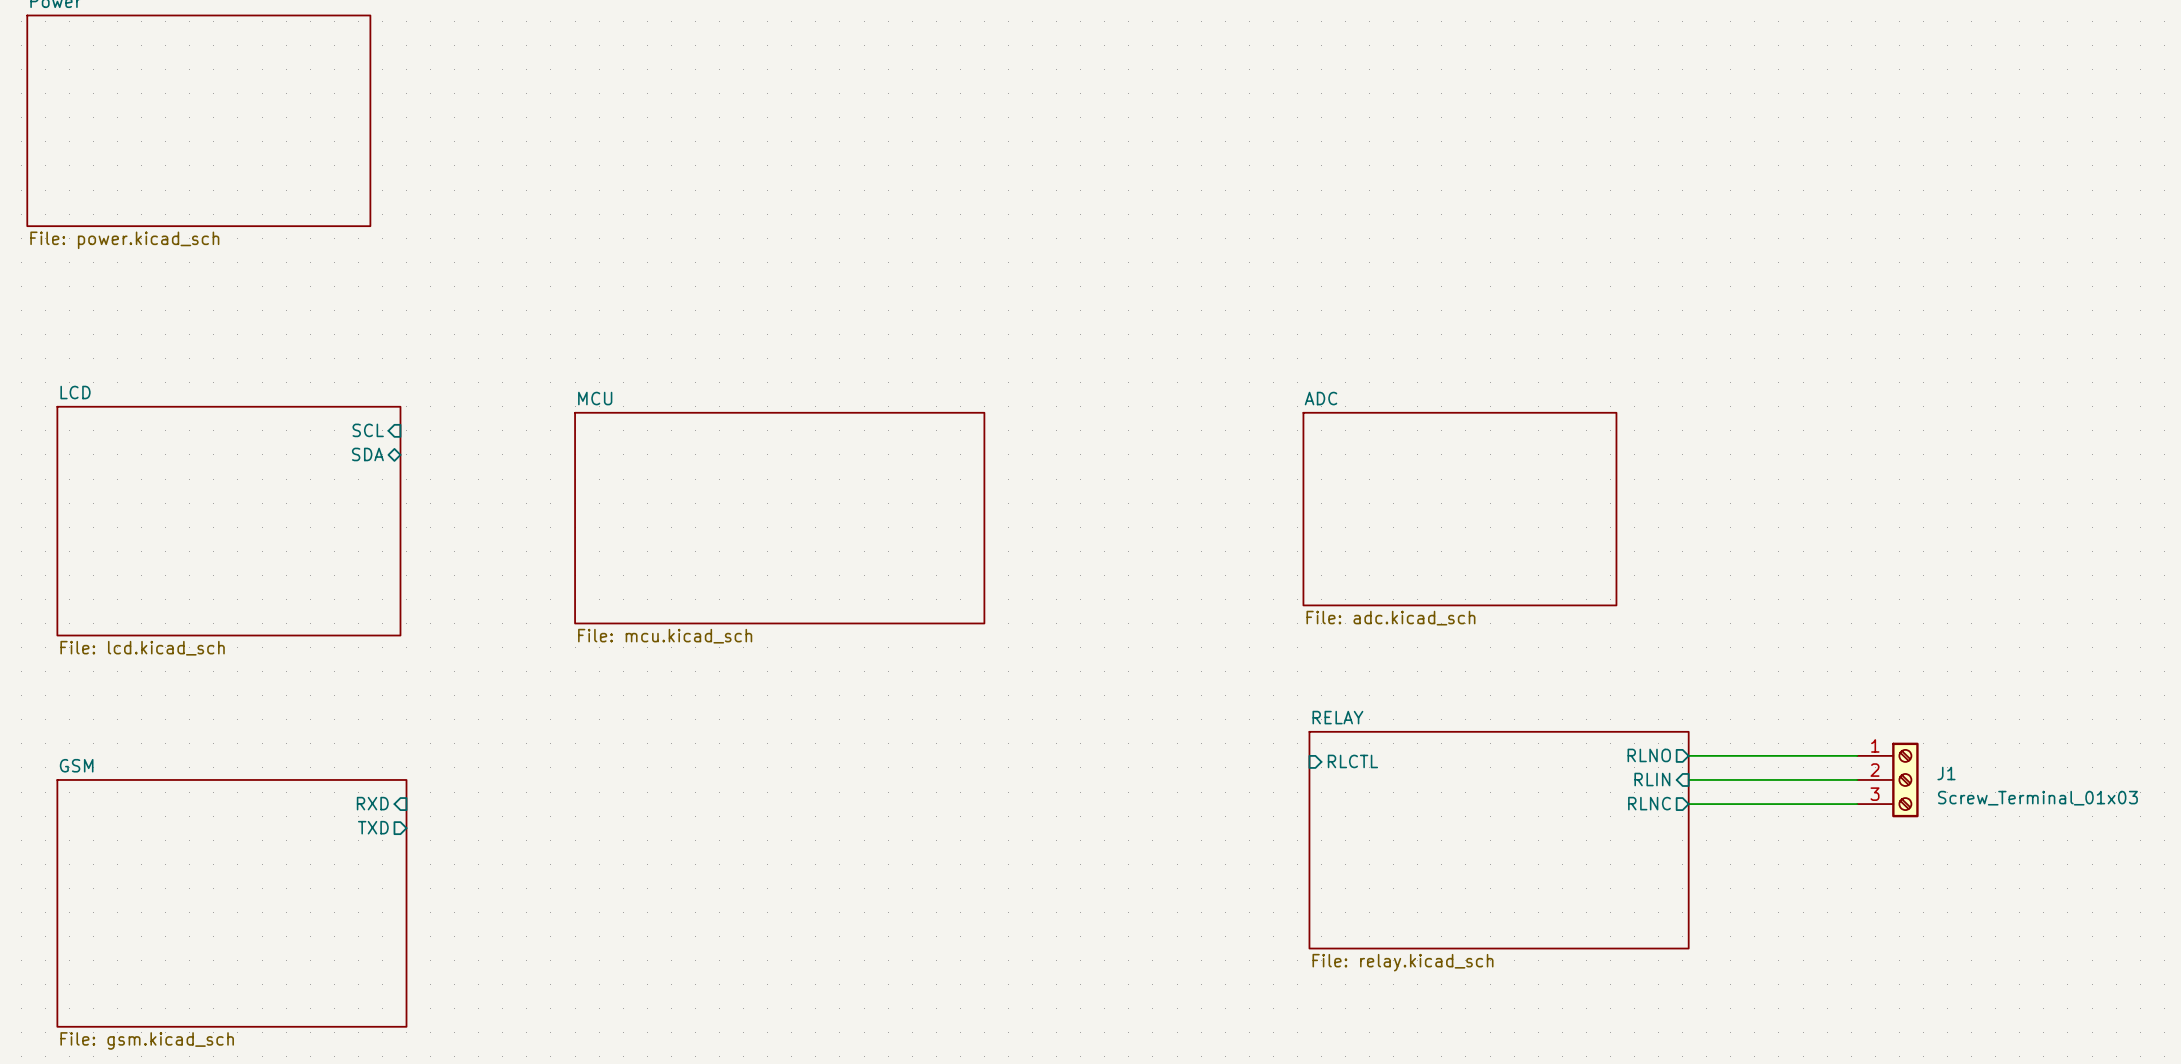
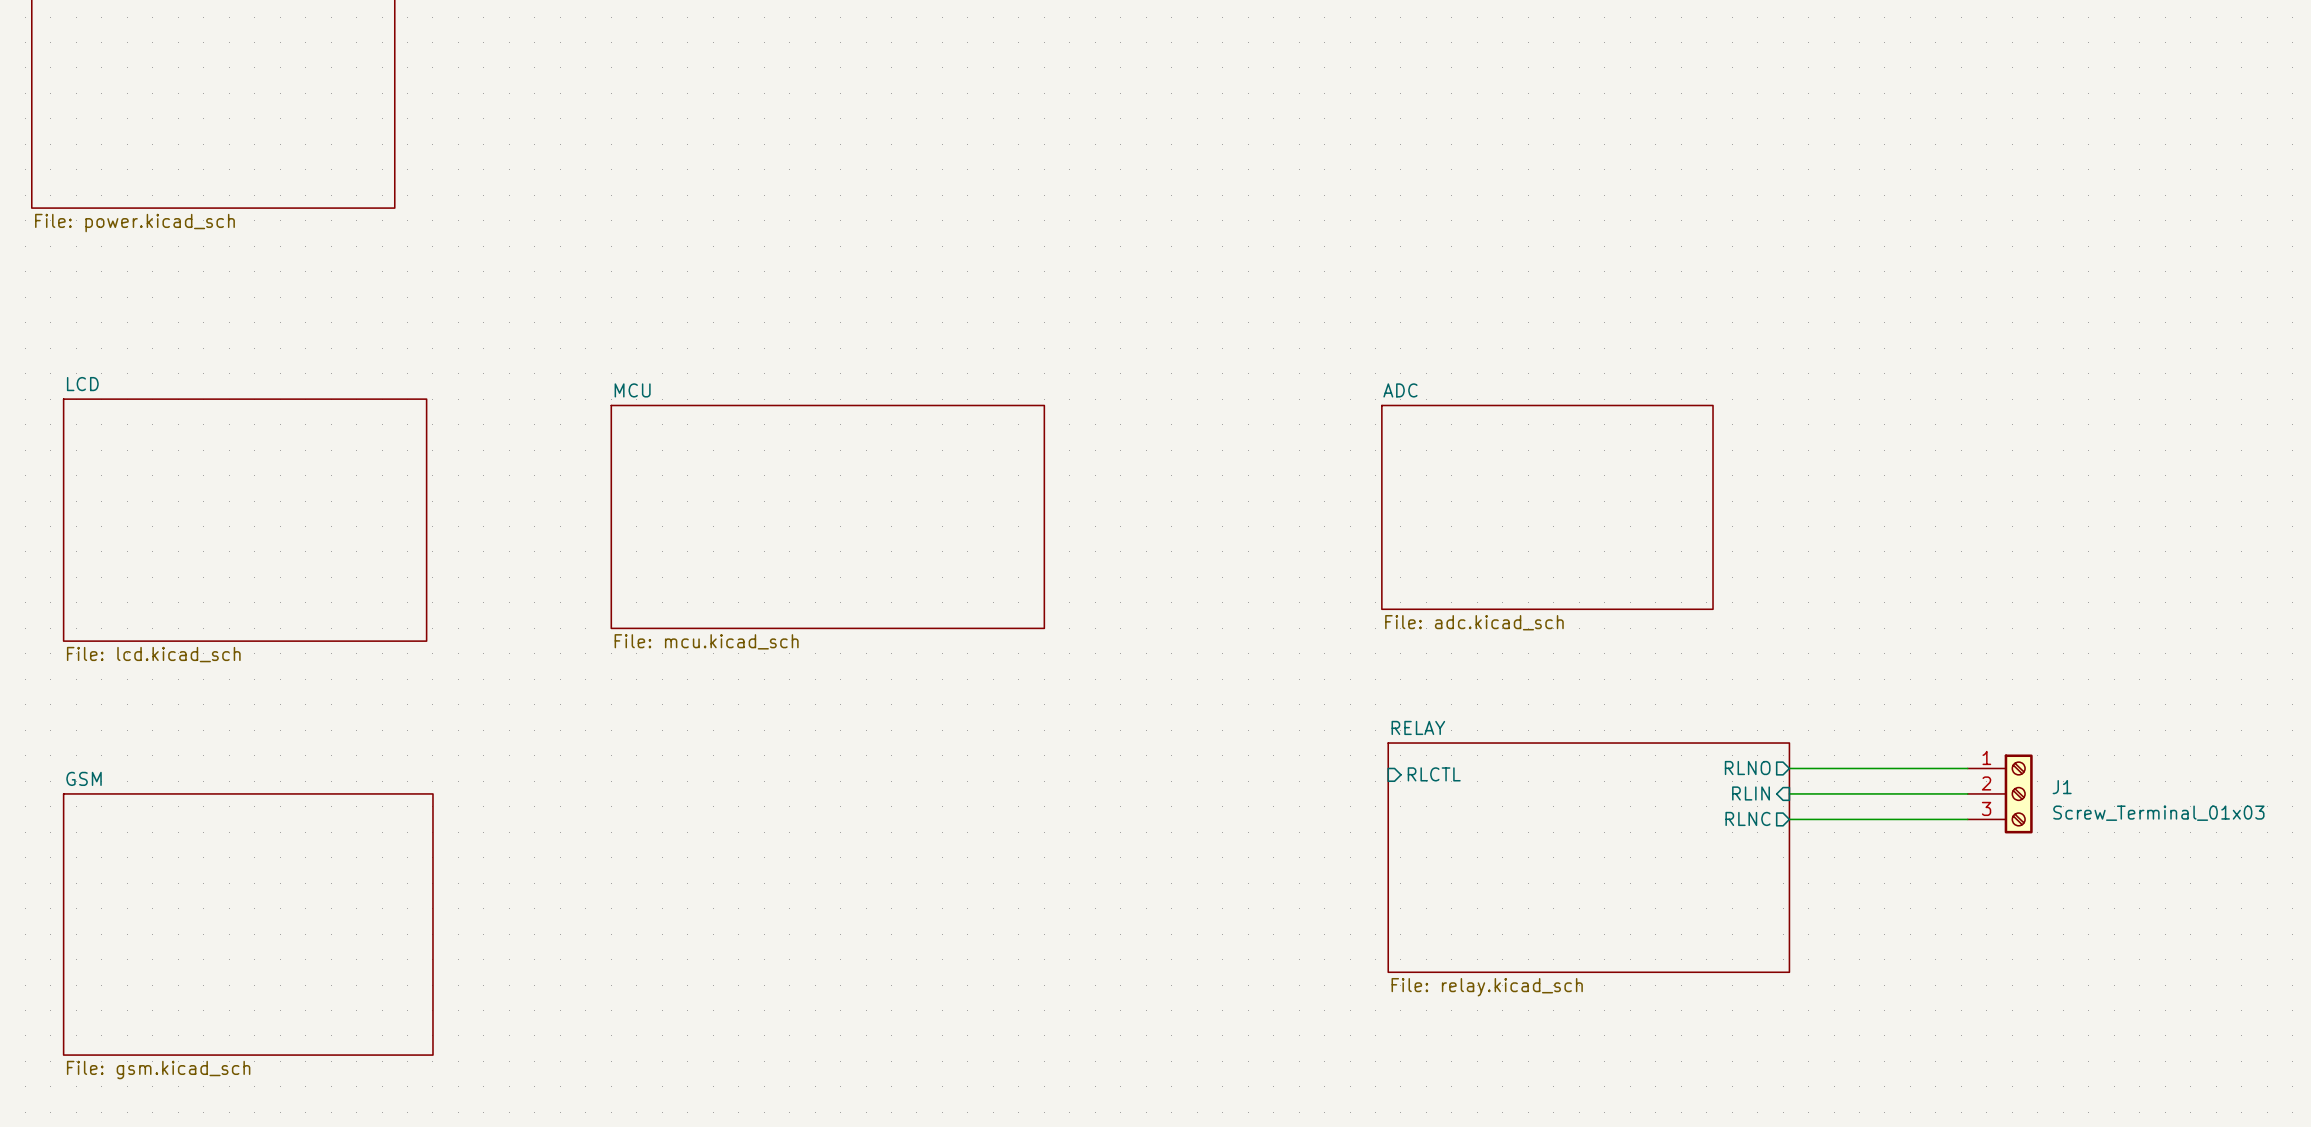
sheet pin: SCL (368, 430) -> none
sheet pin: SDA (367, 454) -> none
sheet pin: RXD (372, 803) -> none
sheet pin: TXD (373, 827) -> none

